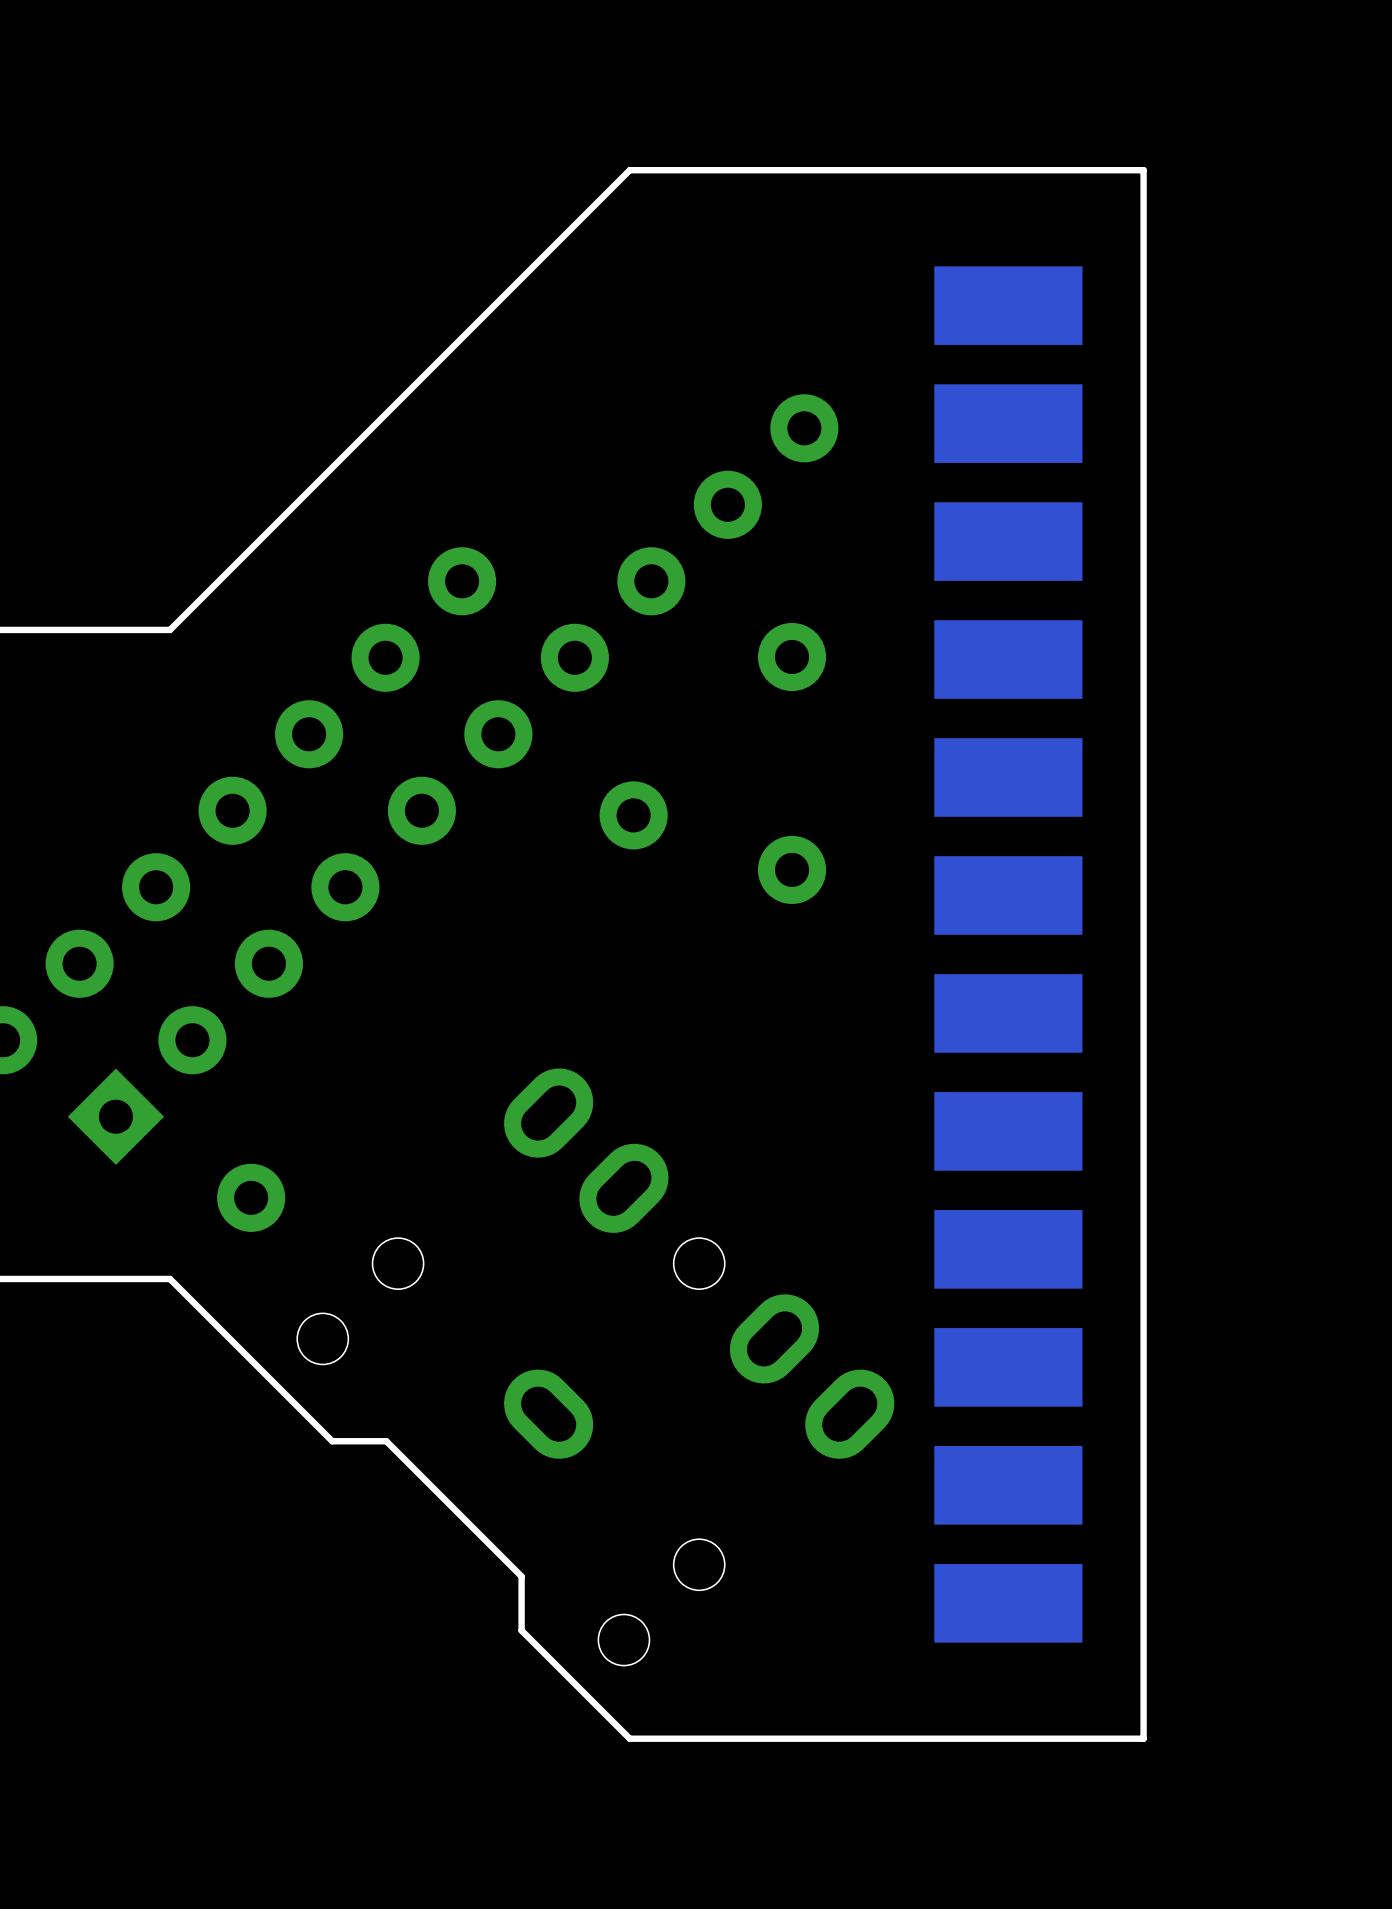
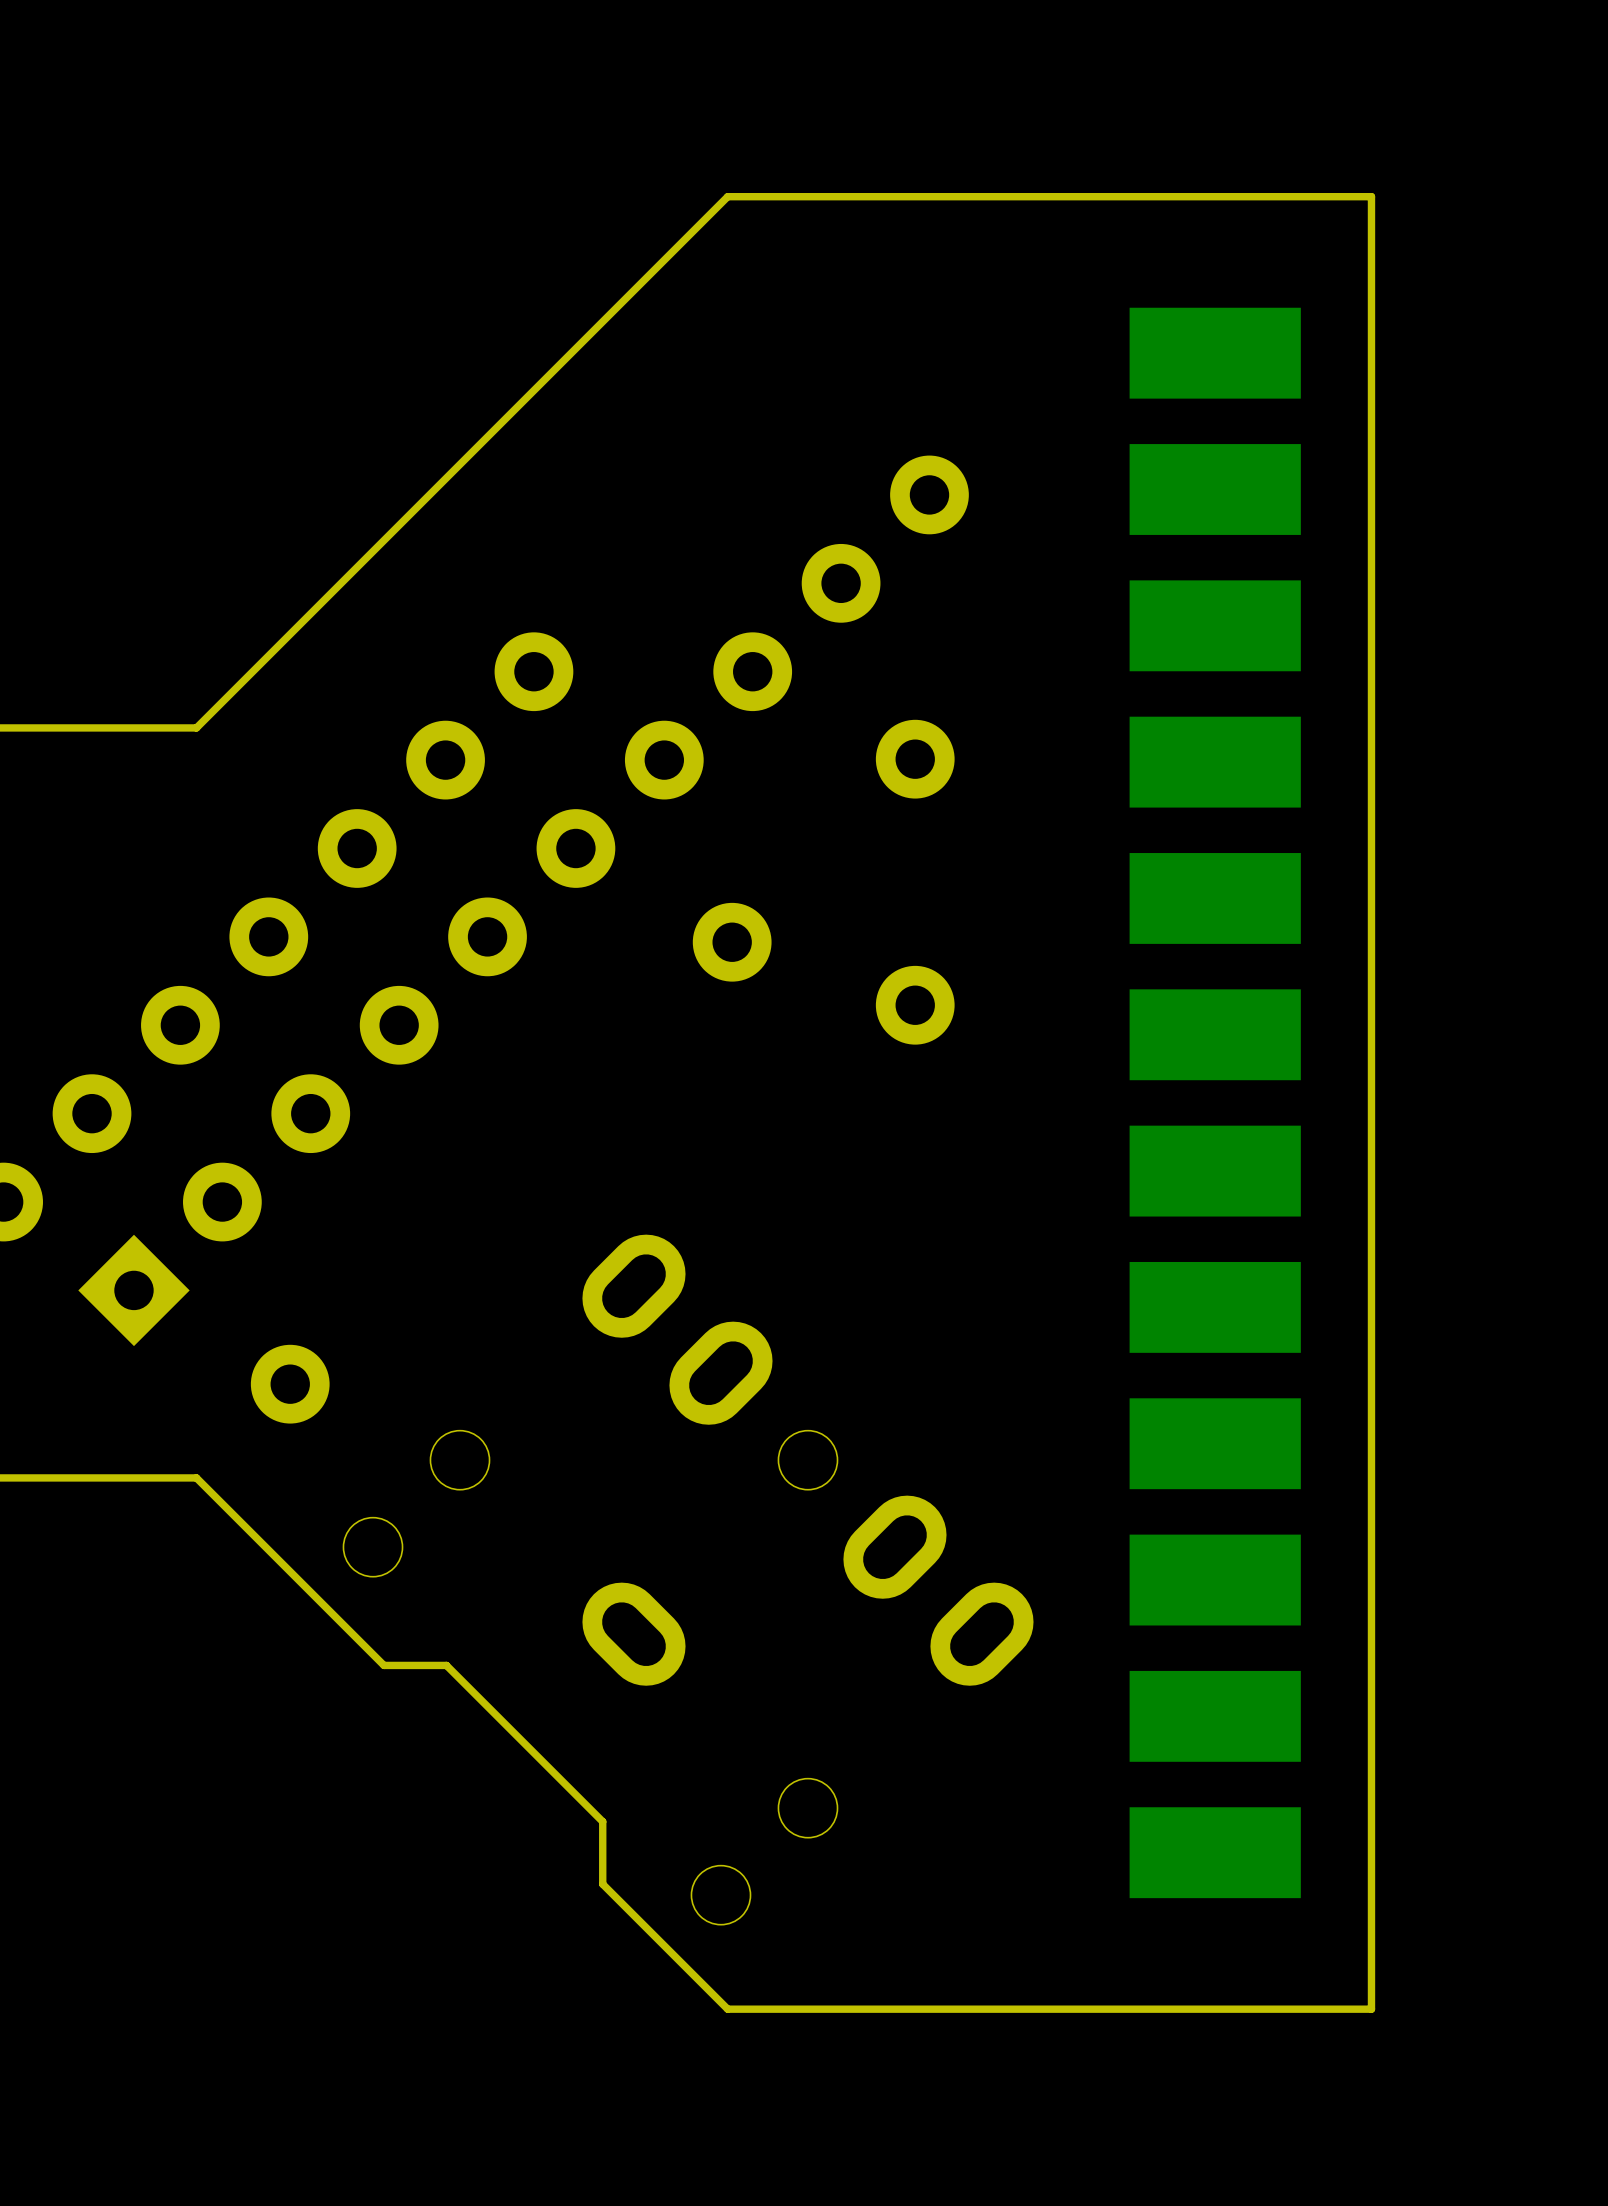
board edge: (1143, 170) (1143, 1738) -> (1321, 196) (1371, 196) (1371, 2009) (1321, 2009)
part position: (1008, 954) -> (1215, 1102)

